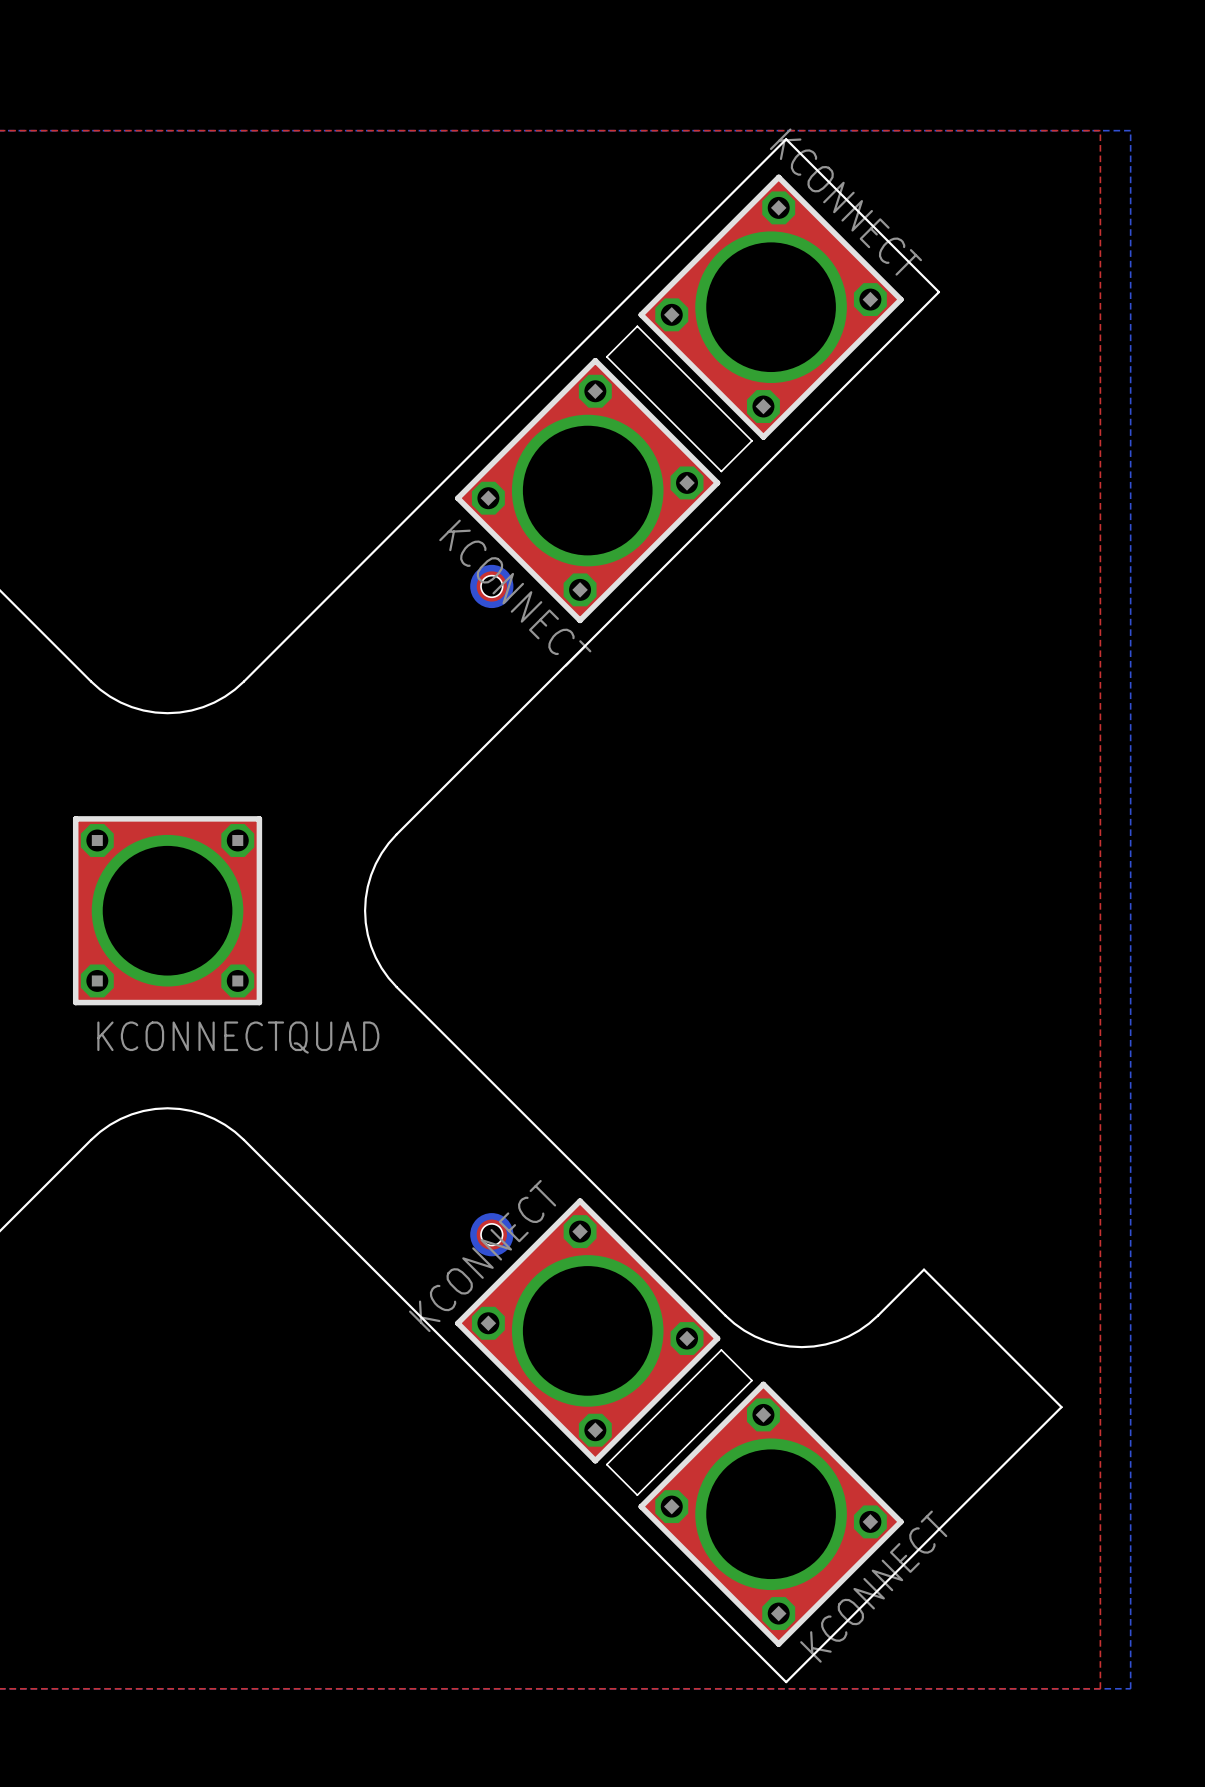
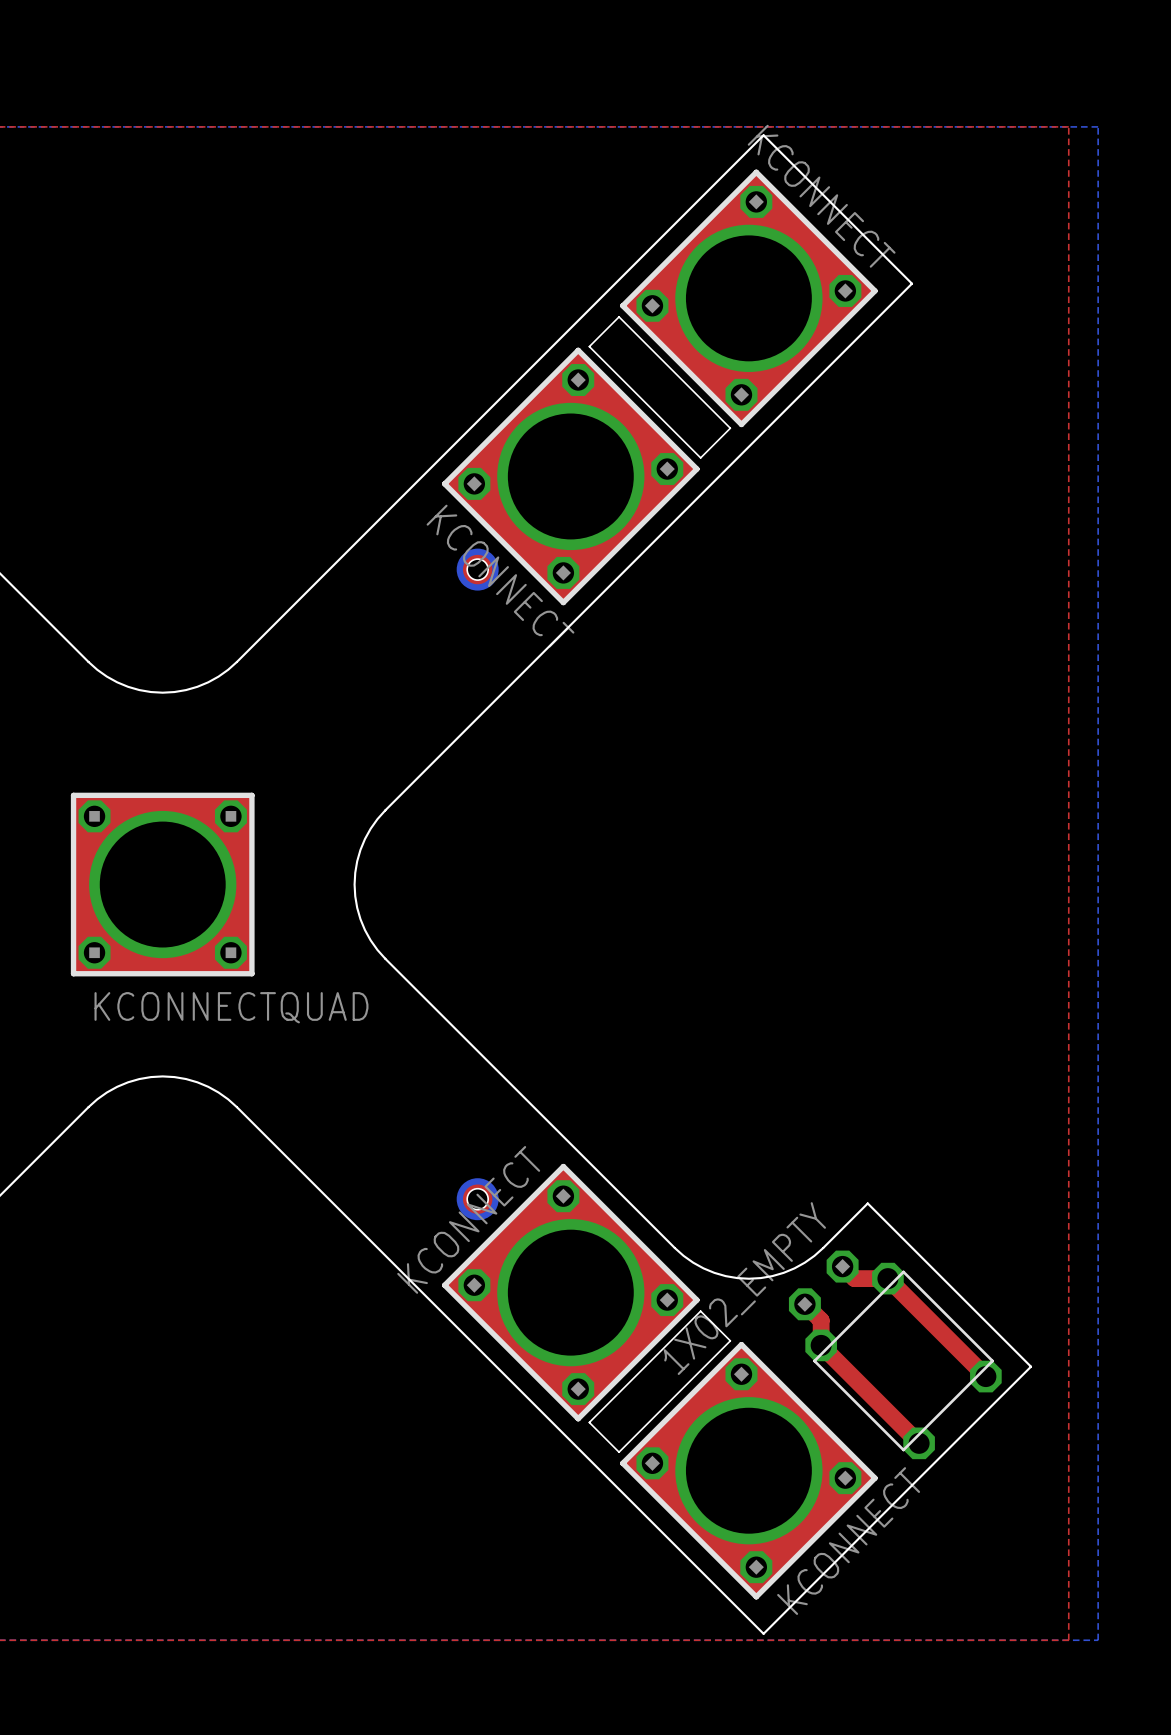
board edge: (924, 1269) (878, 1315) (859, 1330) (837, 1341) (813, 1346) (777, 1344) (754, 1336) (734, 1323) (694, 1284) -> (897, 1233) (867, 1203) (823, 1248) (804, 1262) (783, 1272) (760, 1278) (737, 1278) (714, 1272) (693, 1262) (674, 1248)
top track: none -> (842, 1266) (854, 1278) (887, 1278) (985, 1376)
part: none -> 1X02_EMPTY (823, 1285)
top track: none -> (804, 1304) (821, 1320) (821, 1345) (919, 1443)
part: none -> (903, 1360)

